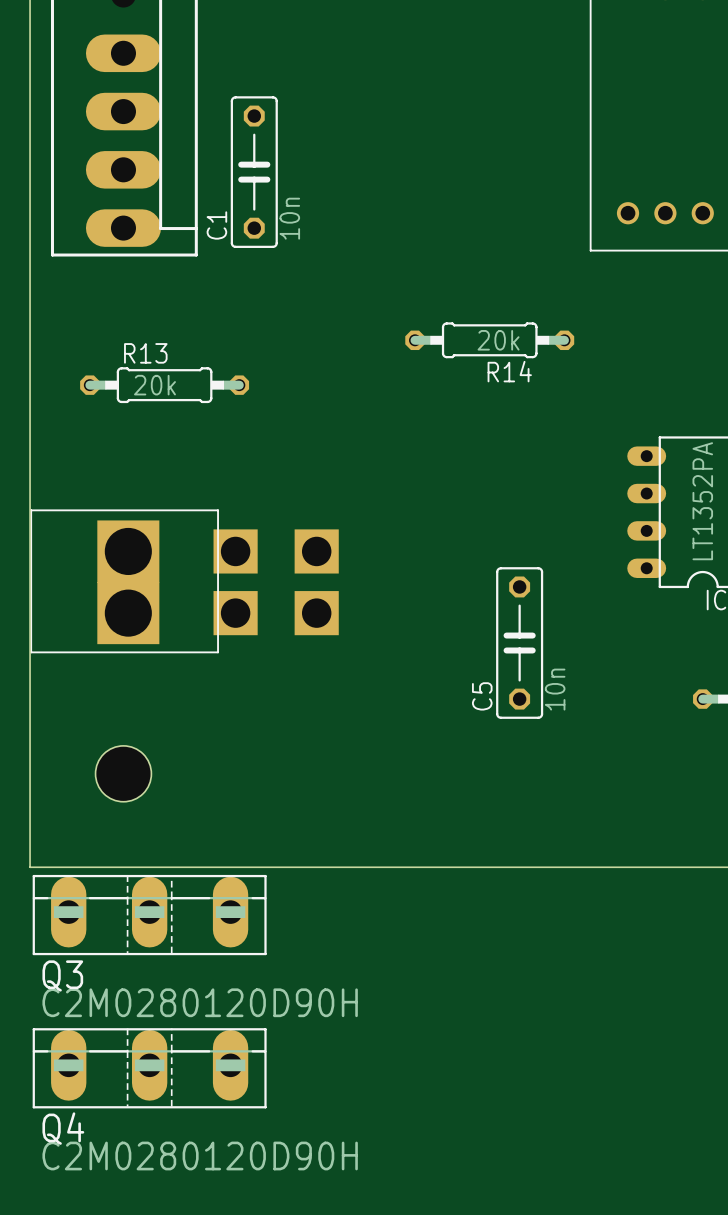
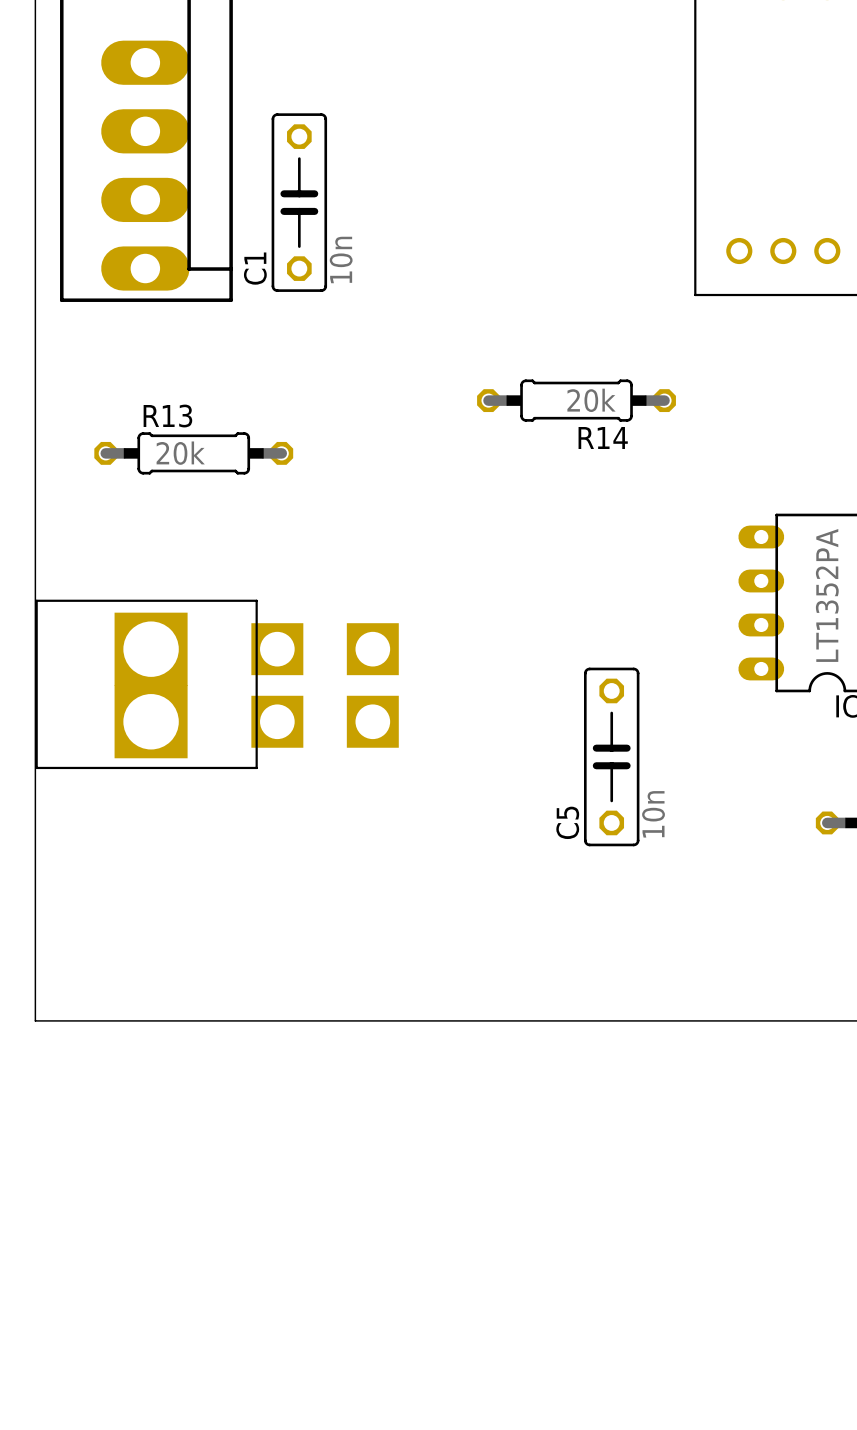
hole: (123, 773) -> none
Q3: C2M0280120D90H (149, 915) -> none
Q4: C2M0280120D90H (149, 1068) -> none

